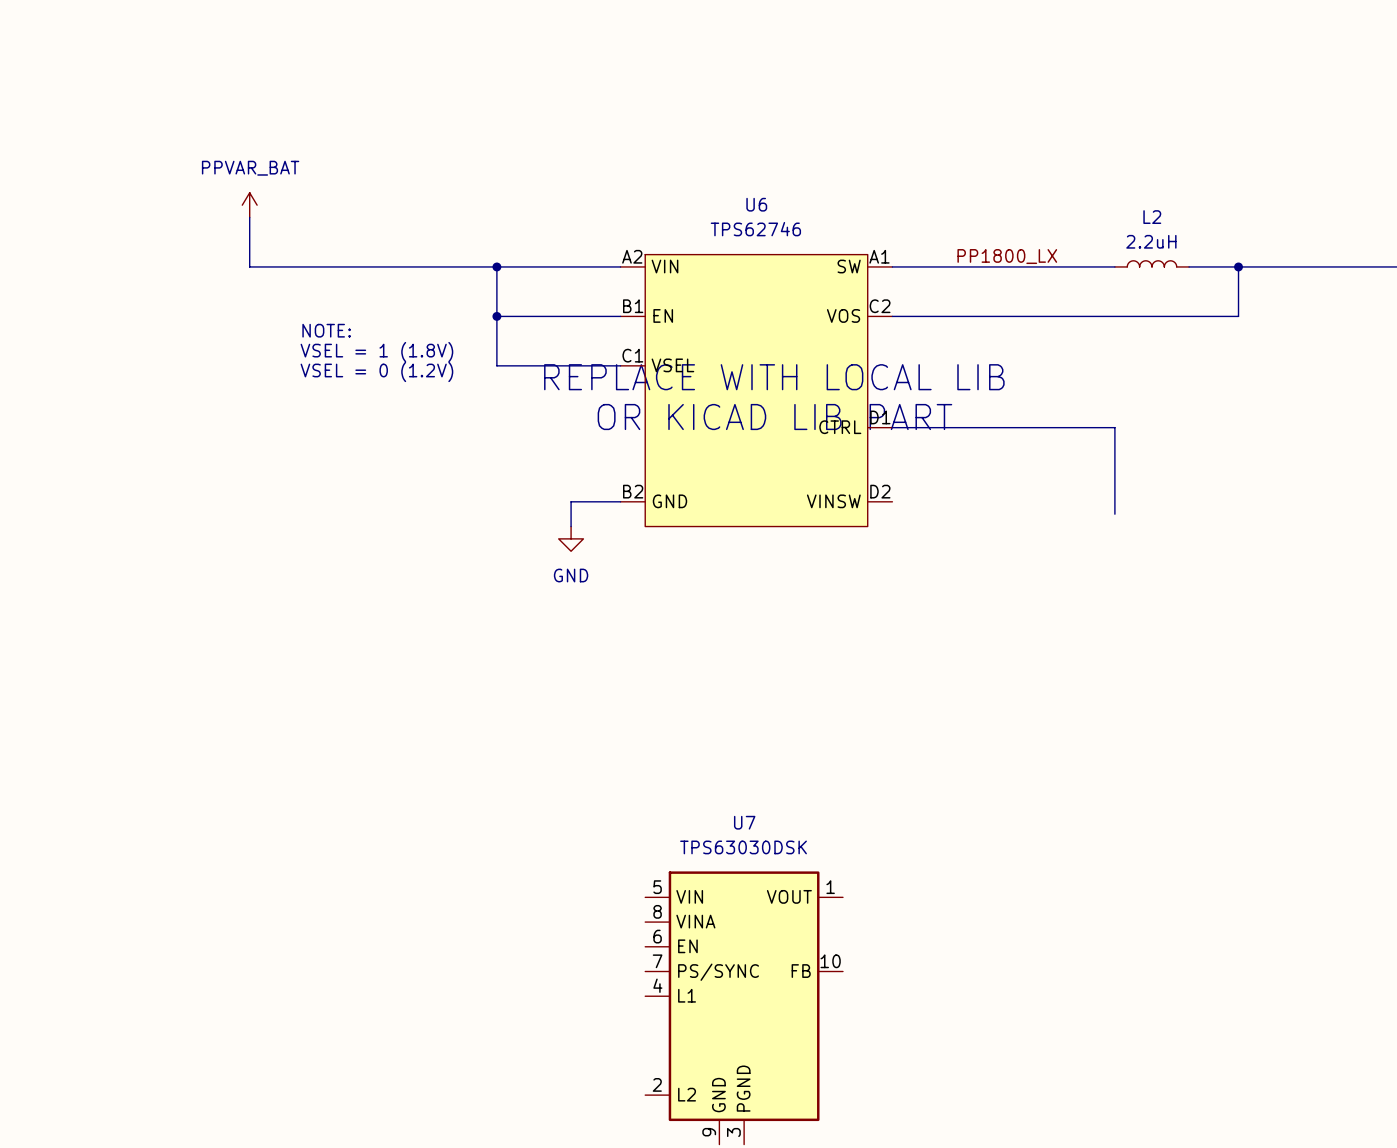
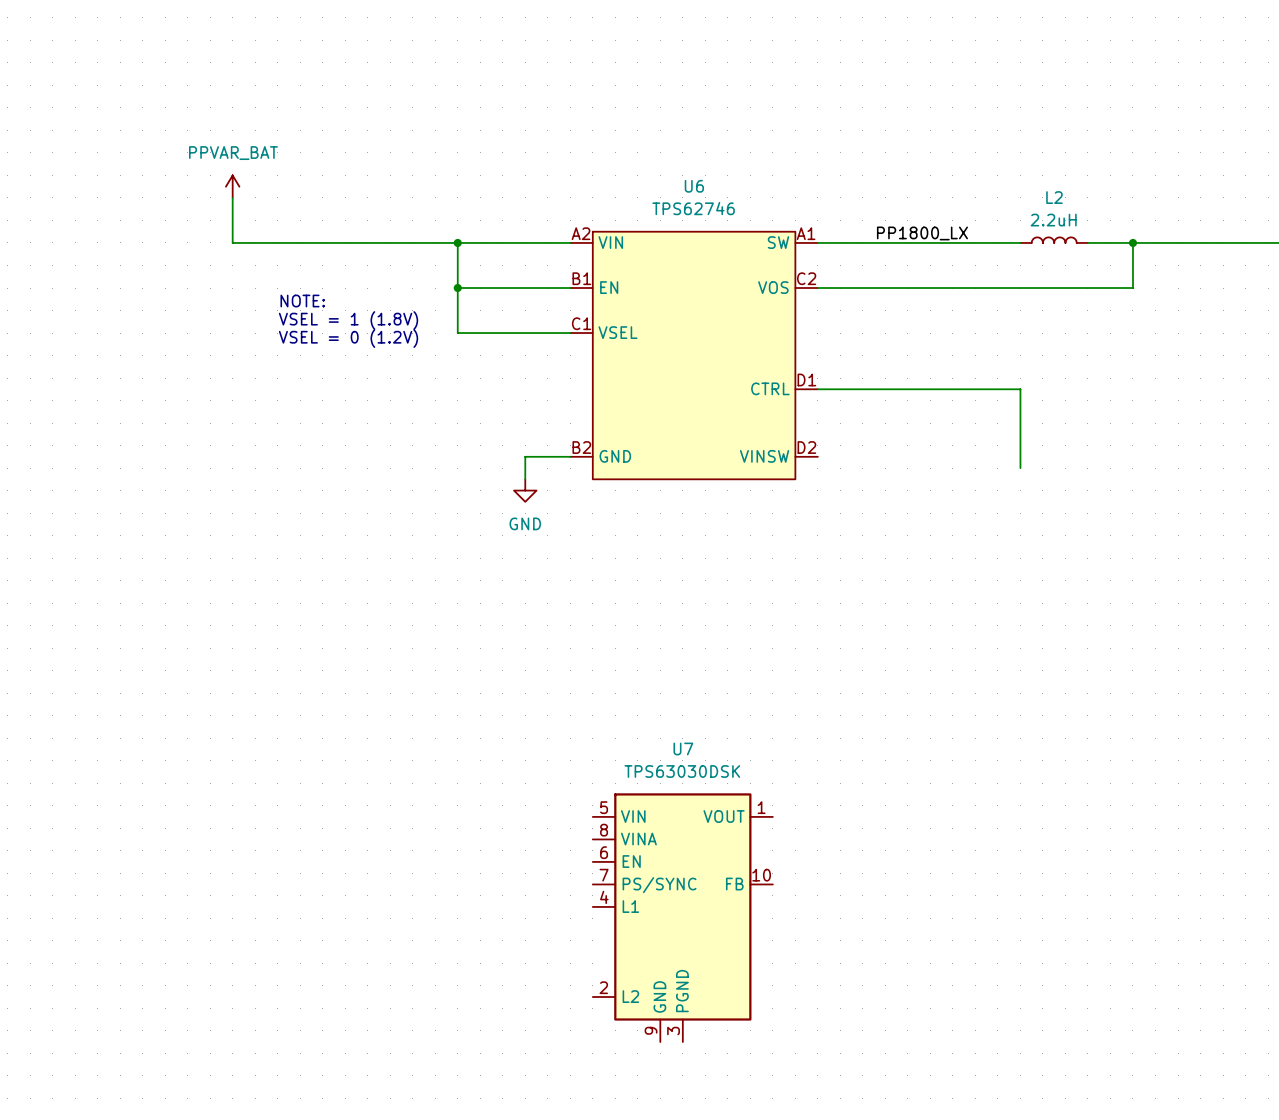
text: REPLACE WITH LOCAL LIB (774, 377) -> none
text: OR KICAD LIB PART (774, 417) -> none

